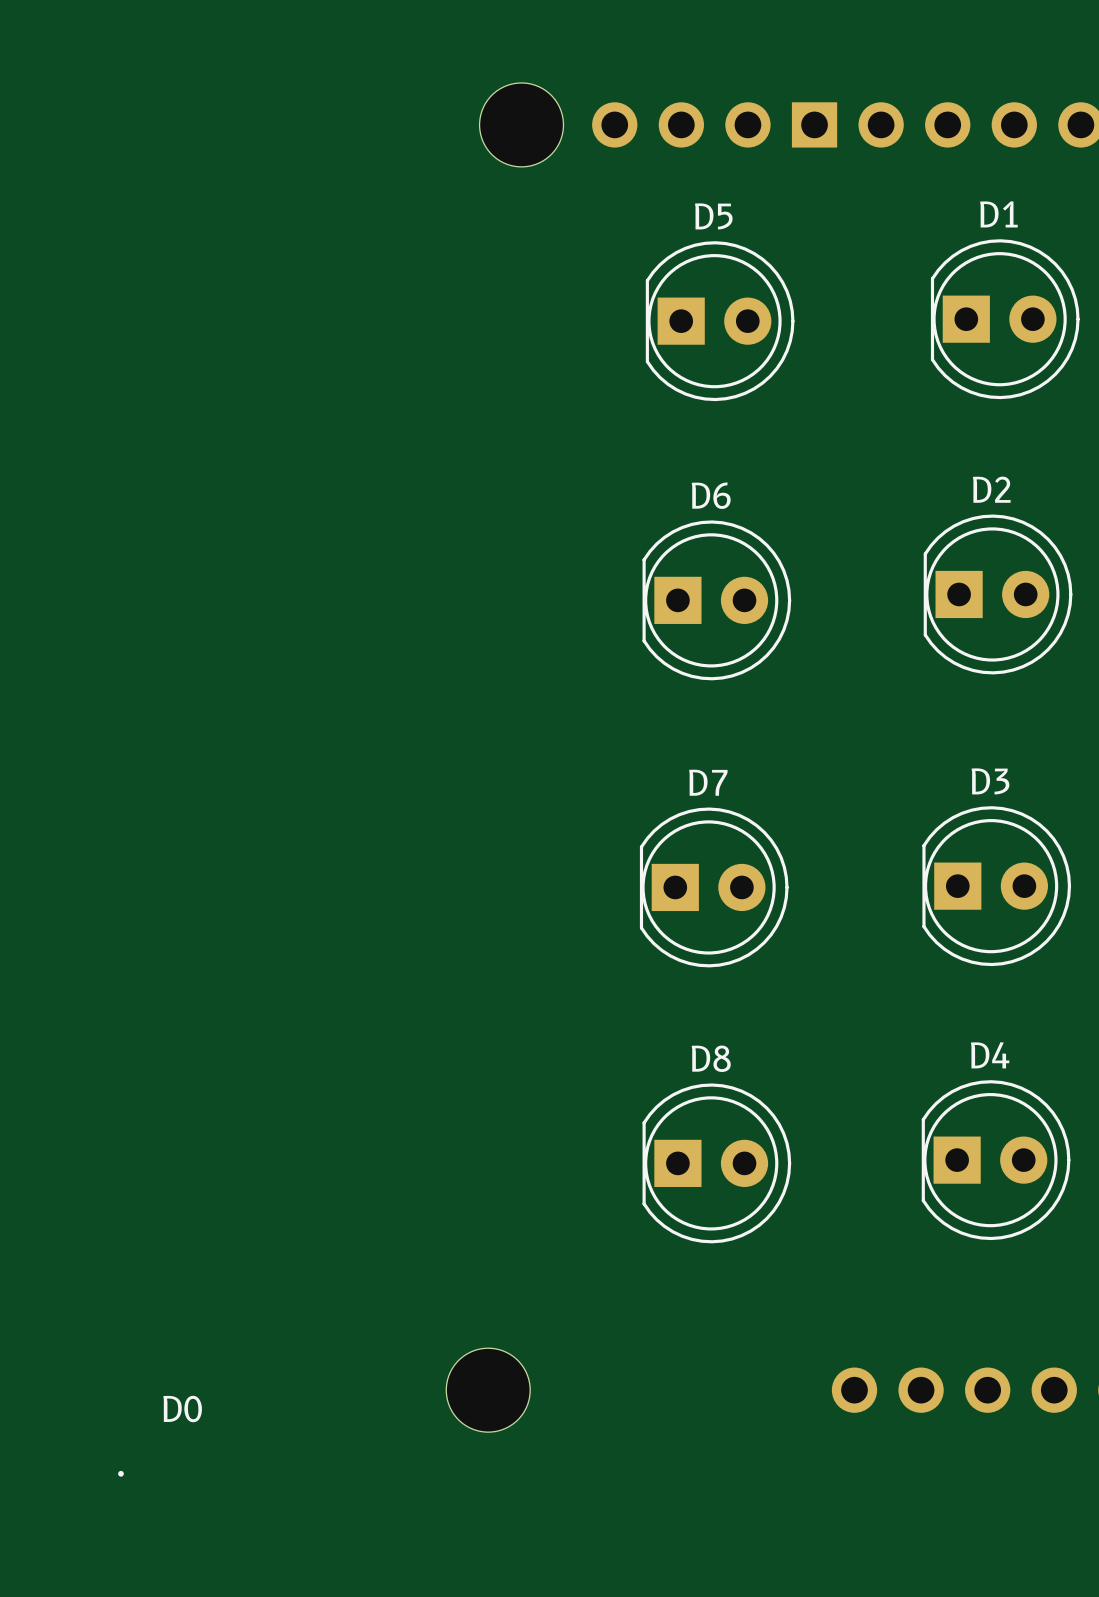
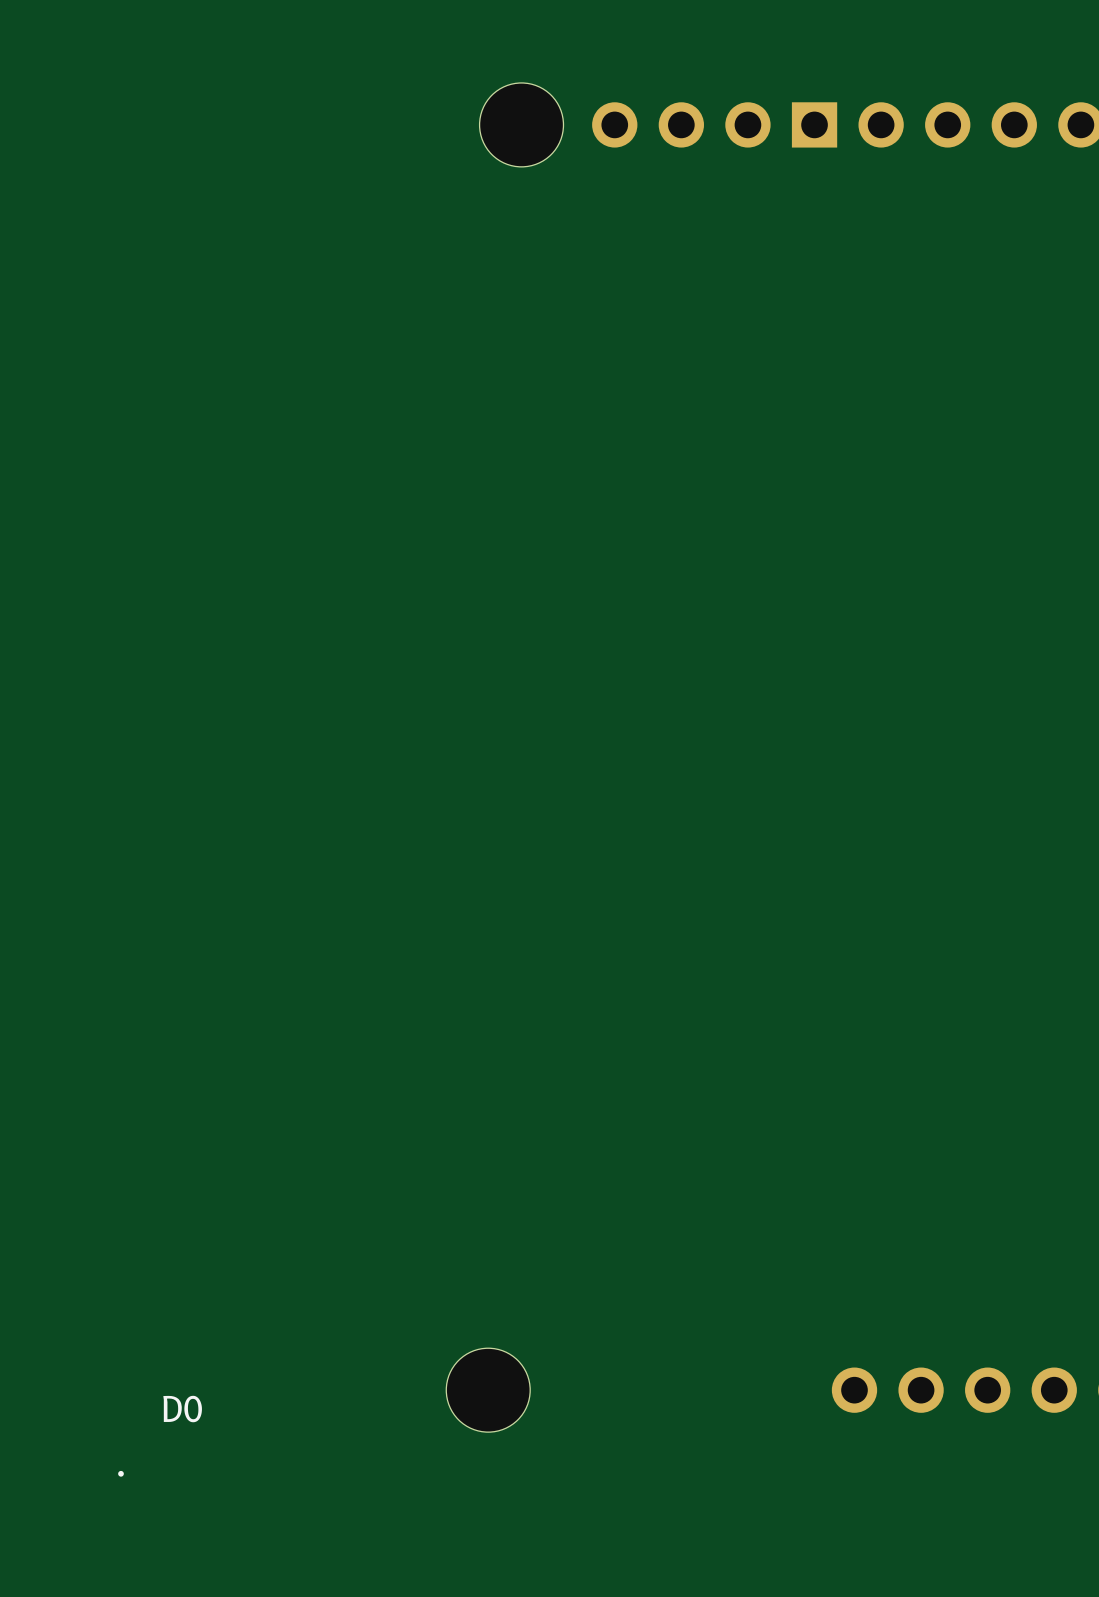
D1: (1005, 319) -> none
D5: (720, 321) -> none
D2: (998, 594) -> none
D6: (716, 600) -> none
D3: (996, 886) -> none
D7: (714, 887) -> none
D4: (996, 1160) -> none
D8: (716, 1163) -> none

